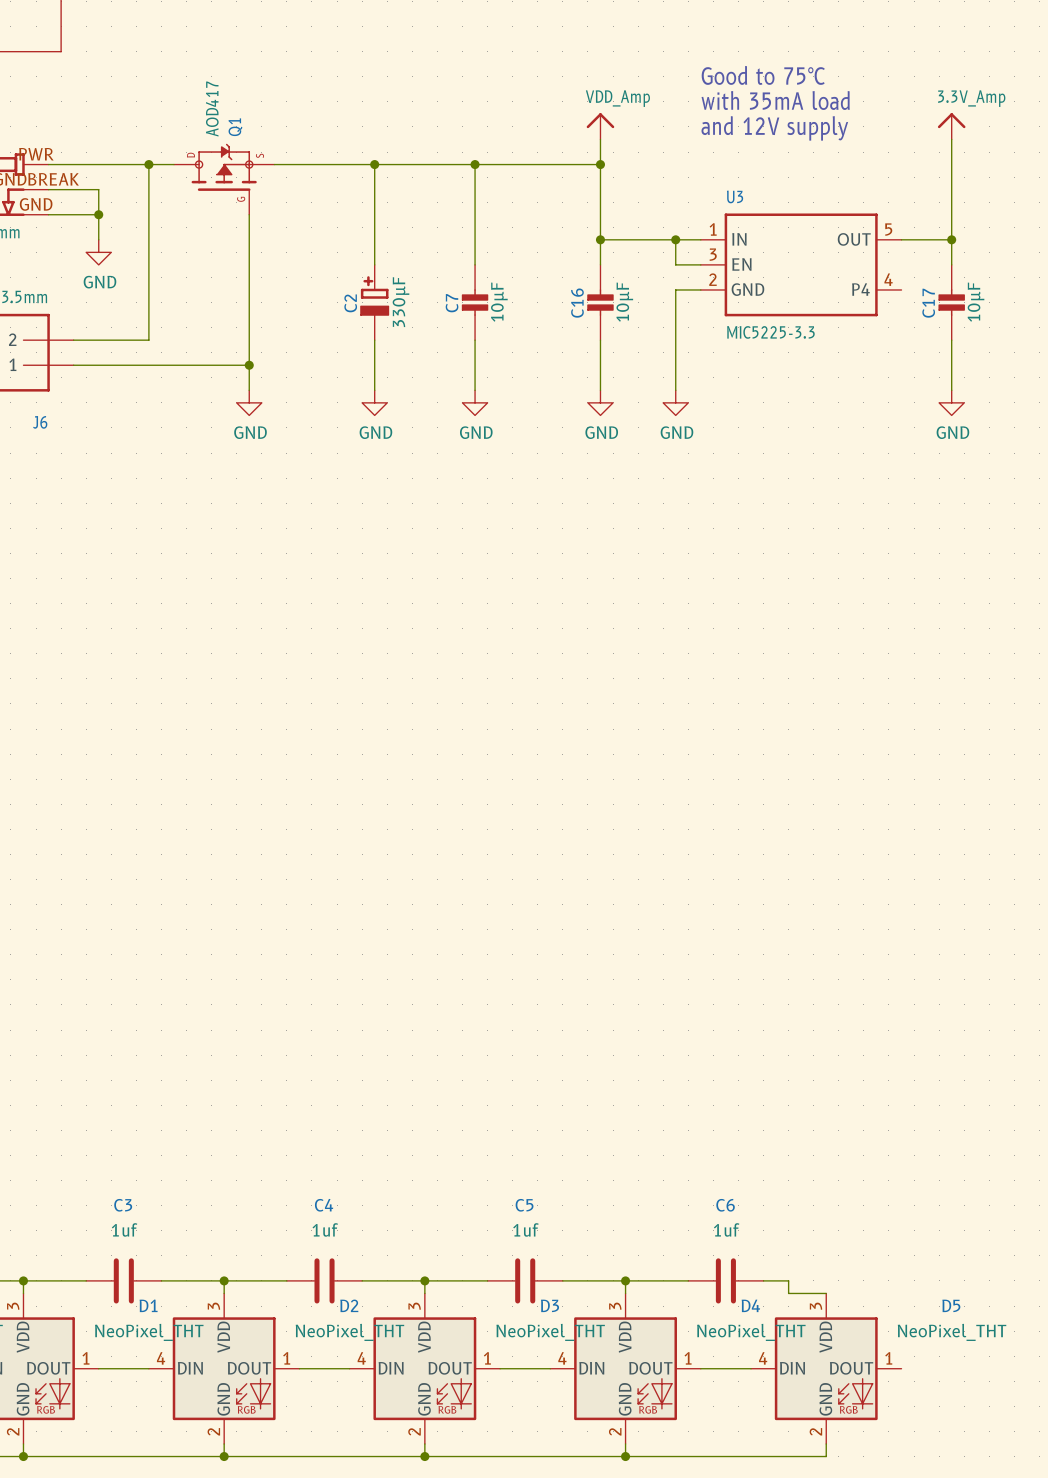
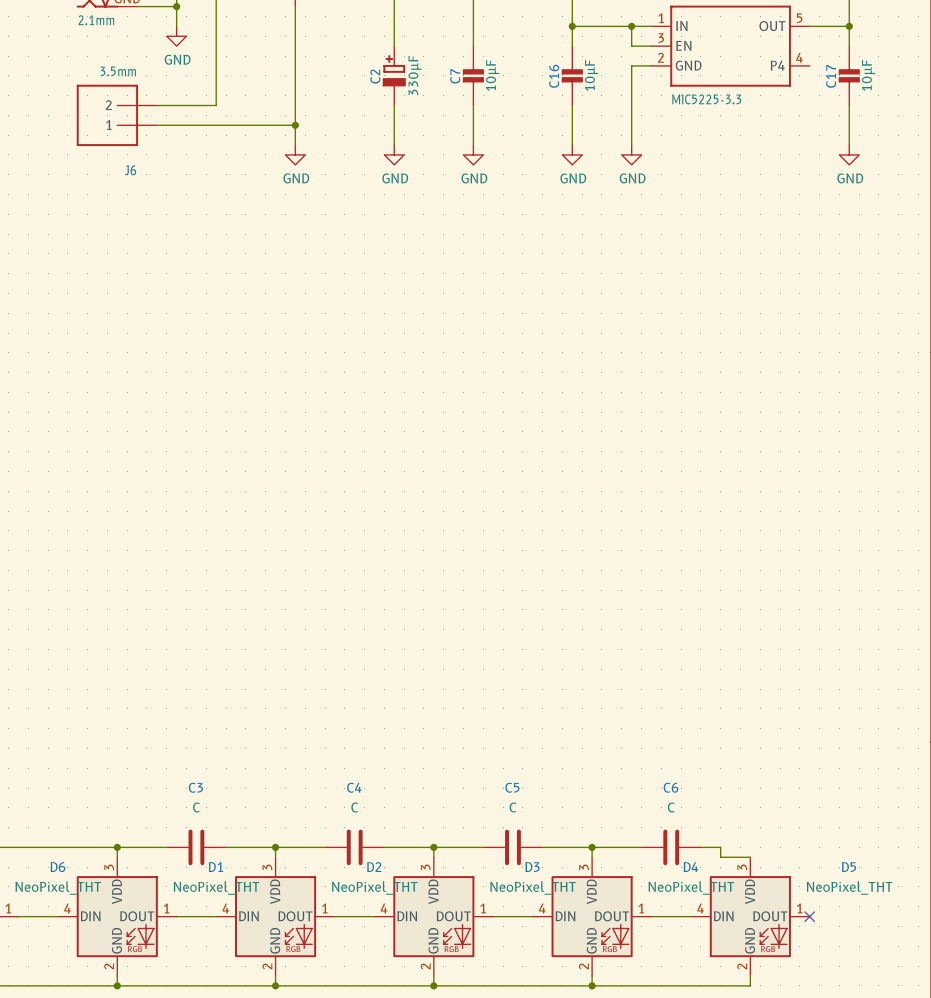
C3 value: 1uf (124, 1229) -> C (196, 807)
C4 value: 1uf (325, 1229) -> C (354, 807)
C5 value: 1uf (525, 1229) -> C (513, 807)
C6 value: 1uf (726, 1229) -> C (671, 807)
no-connect mark: none -> (809, 916)

